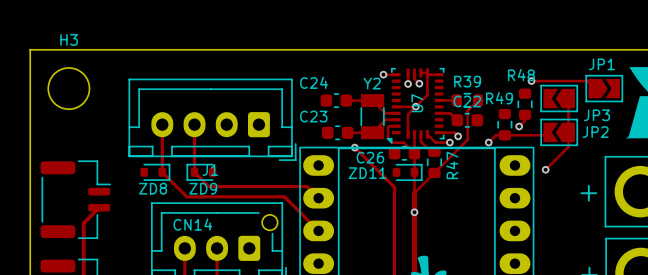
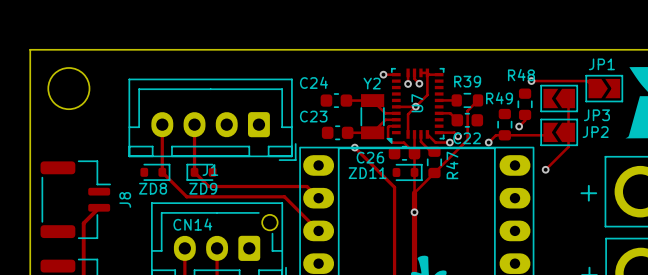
H3 name: H3 (69, 39) -> none
C22 name position: C22 (467, 101) -> C22 (467, 138)
J8 name: none -> J8 (125, 199)

